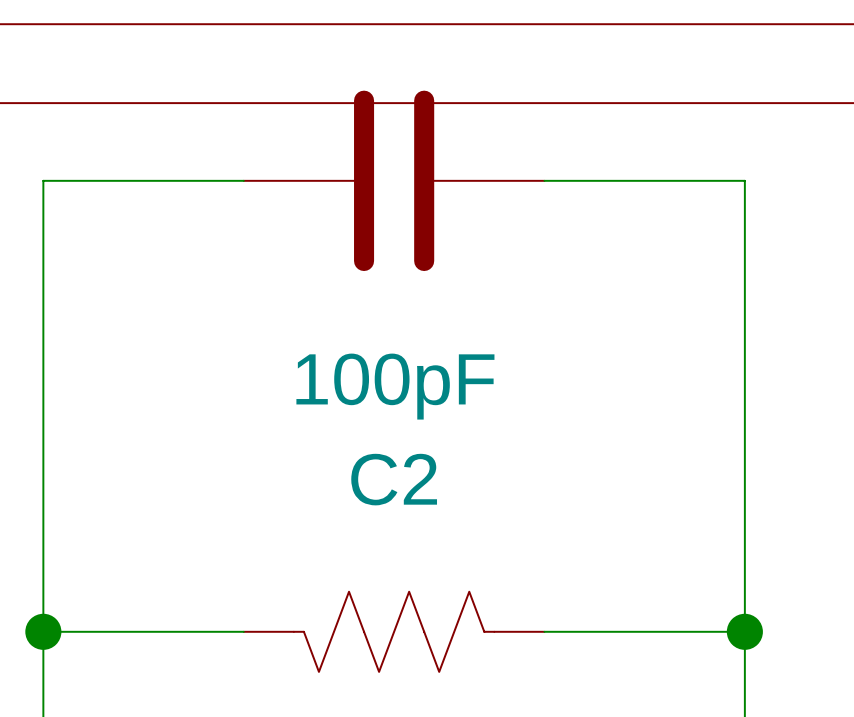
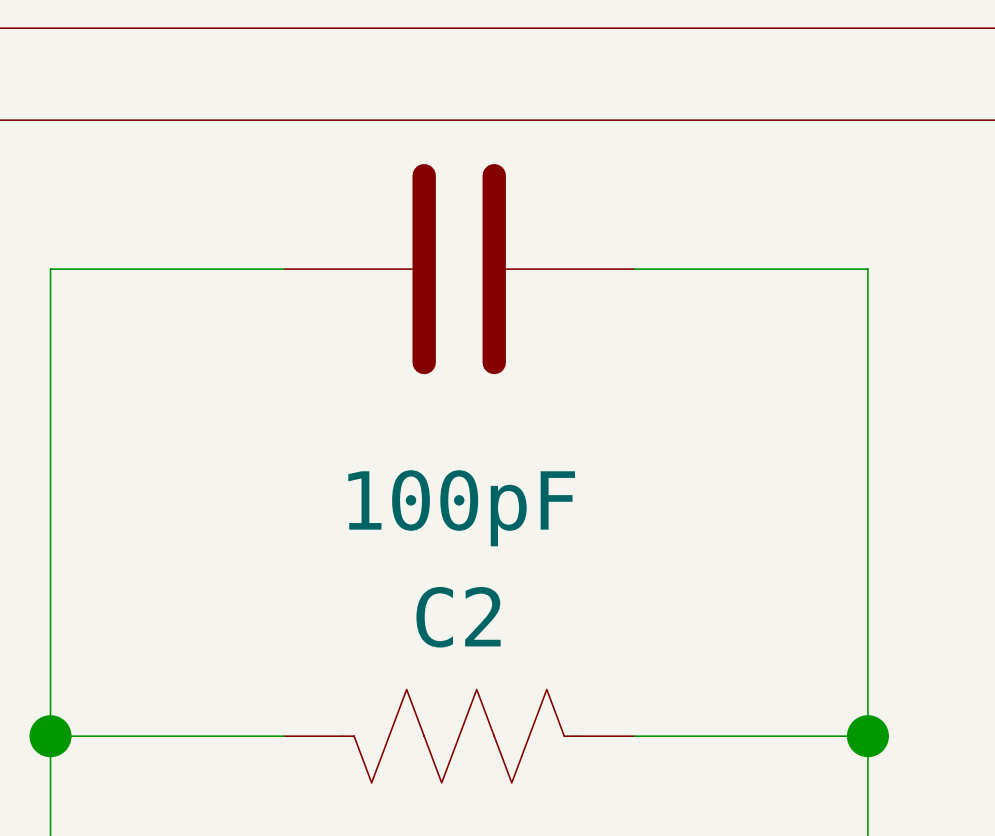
wire: (243, 180) (43, 180) (43, 230) -> (284, 269) (50, 269)
C2 position: (394, 180) -> (459, 269)
wire: (544, 180) (744, 180) (744, 230) -> (634, 269) (867, 269)

